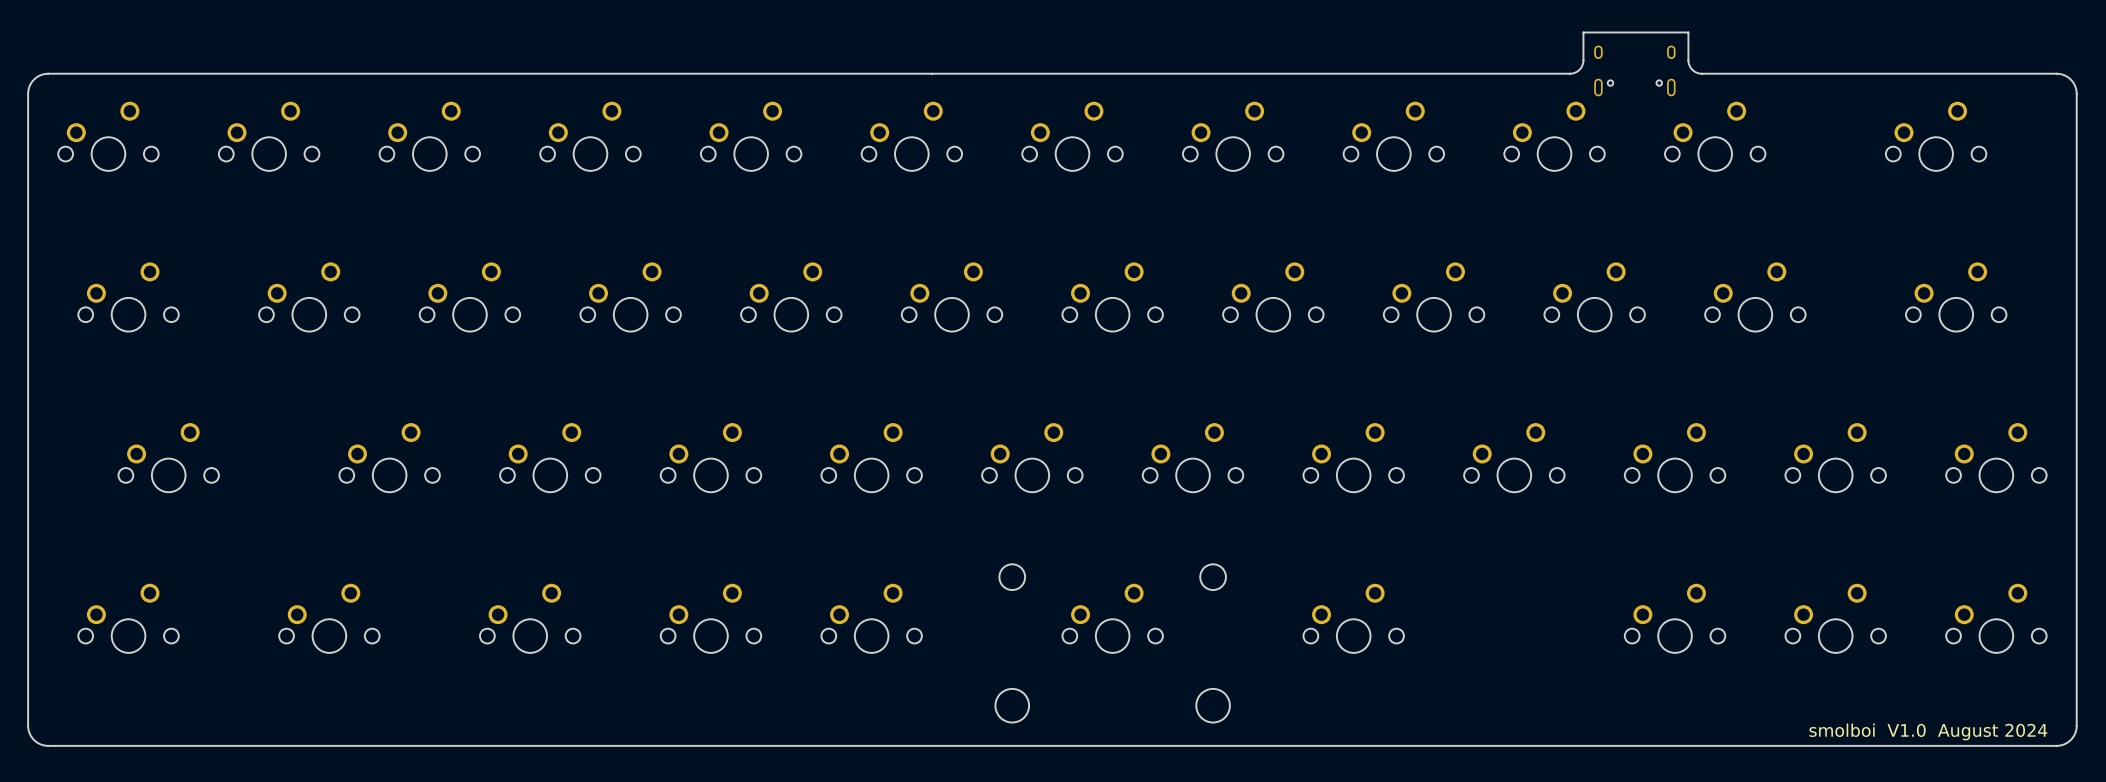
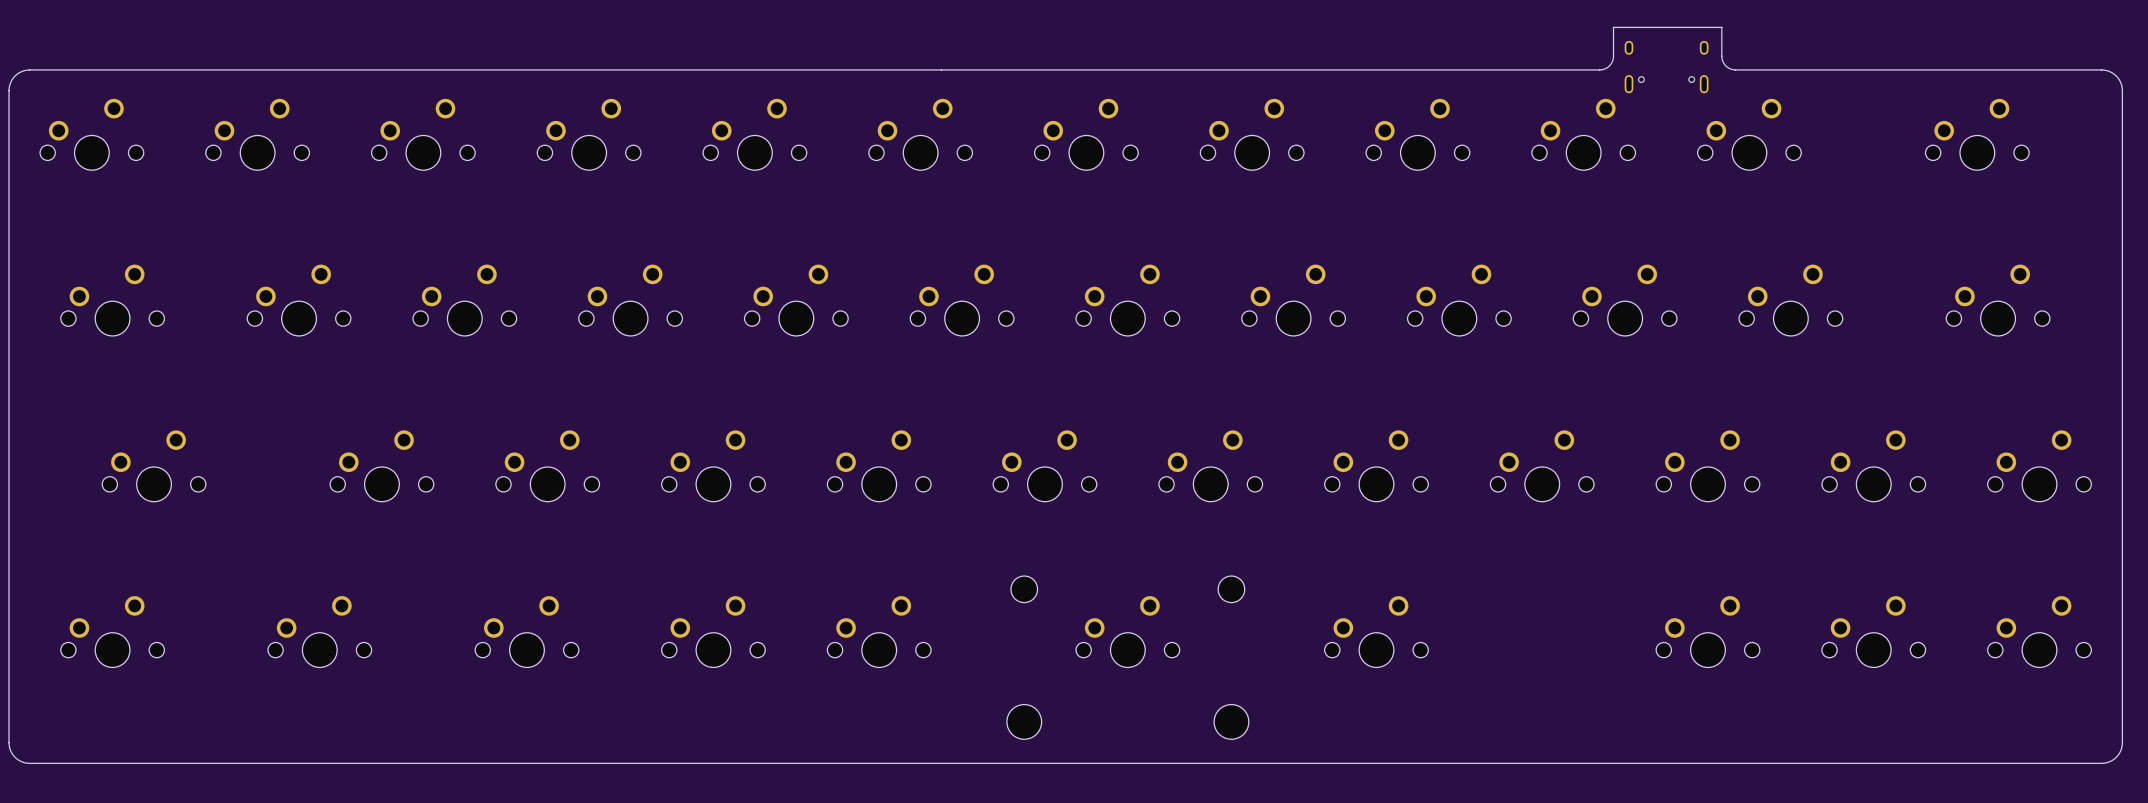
text: smolboi V1.0 August 2024 (1928, 731) -> none

